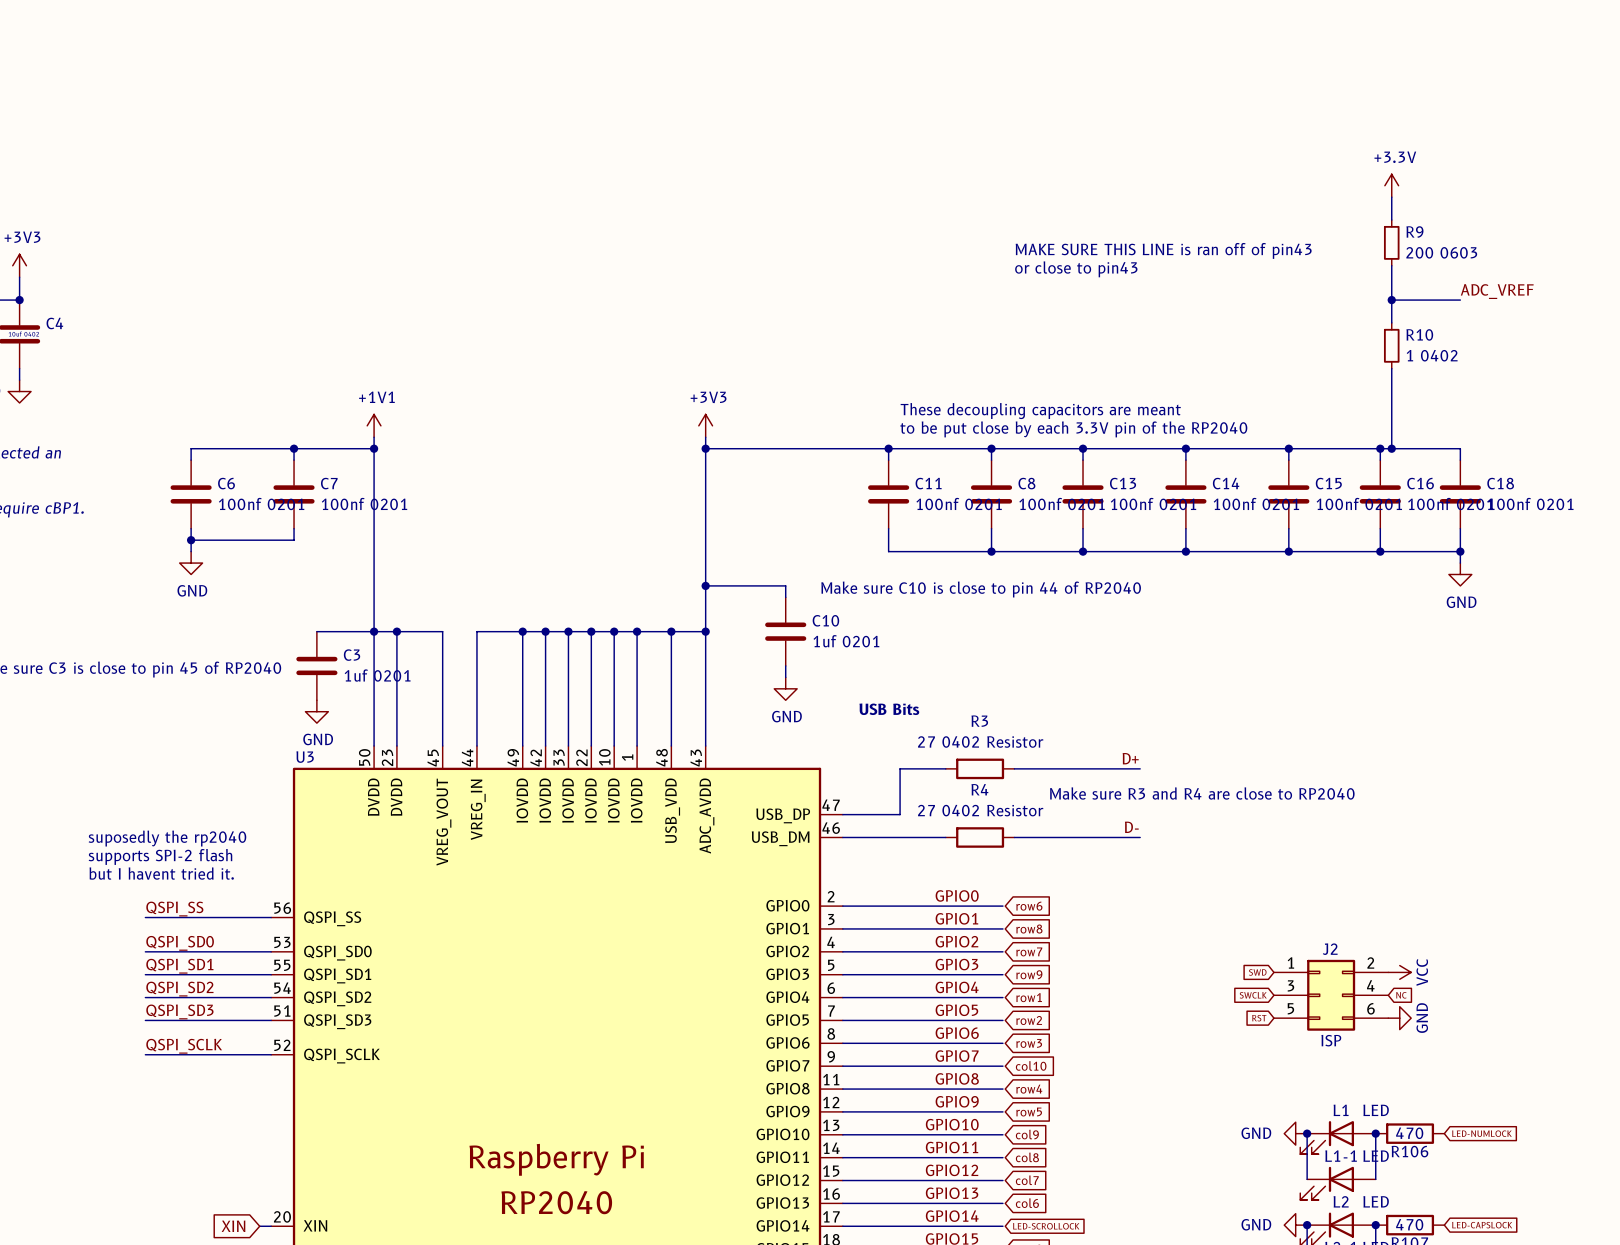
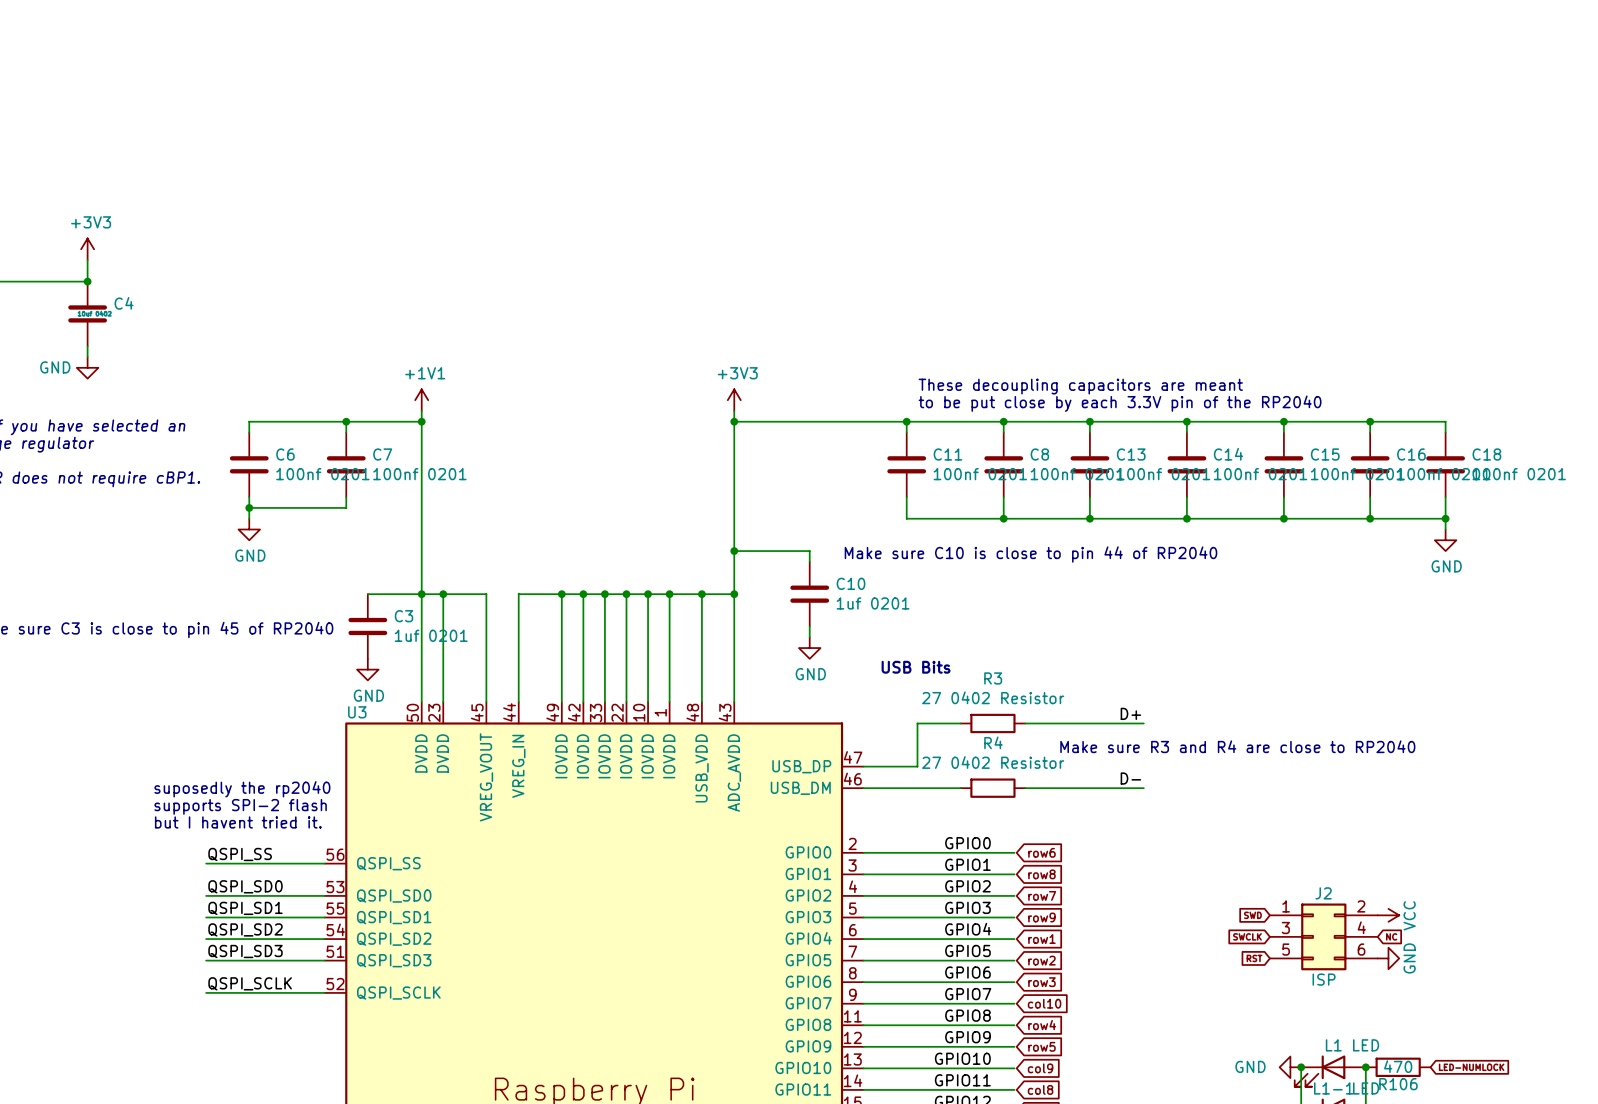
power symbol: +3.3V (1391, 185) -> none
wire: (1391, 197) (1391, 220) -> none
R9: 200 0603 (1391, 242) -> none
text: MAKE SURE THIS LINE is ran off of pin43 (1163, 250) -> none
wire: (1391, 265) (1391, 322) -> none
text: or close to pin43 (1076, 269) -> none
label: ADC_VREF (1497, 291) -> none
wire: (1391, 300) (1460, 300) -> none
junction: (1391, 300) -> none
R10: 1 0402 (1391, 345) -> none
wire: (1391, 368) (1391, 448) -> none
junction: (1391, 448) -> none

